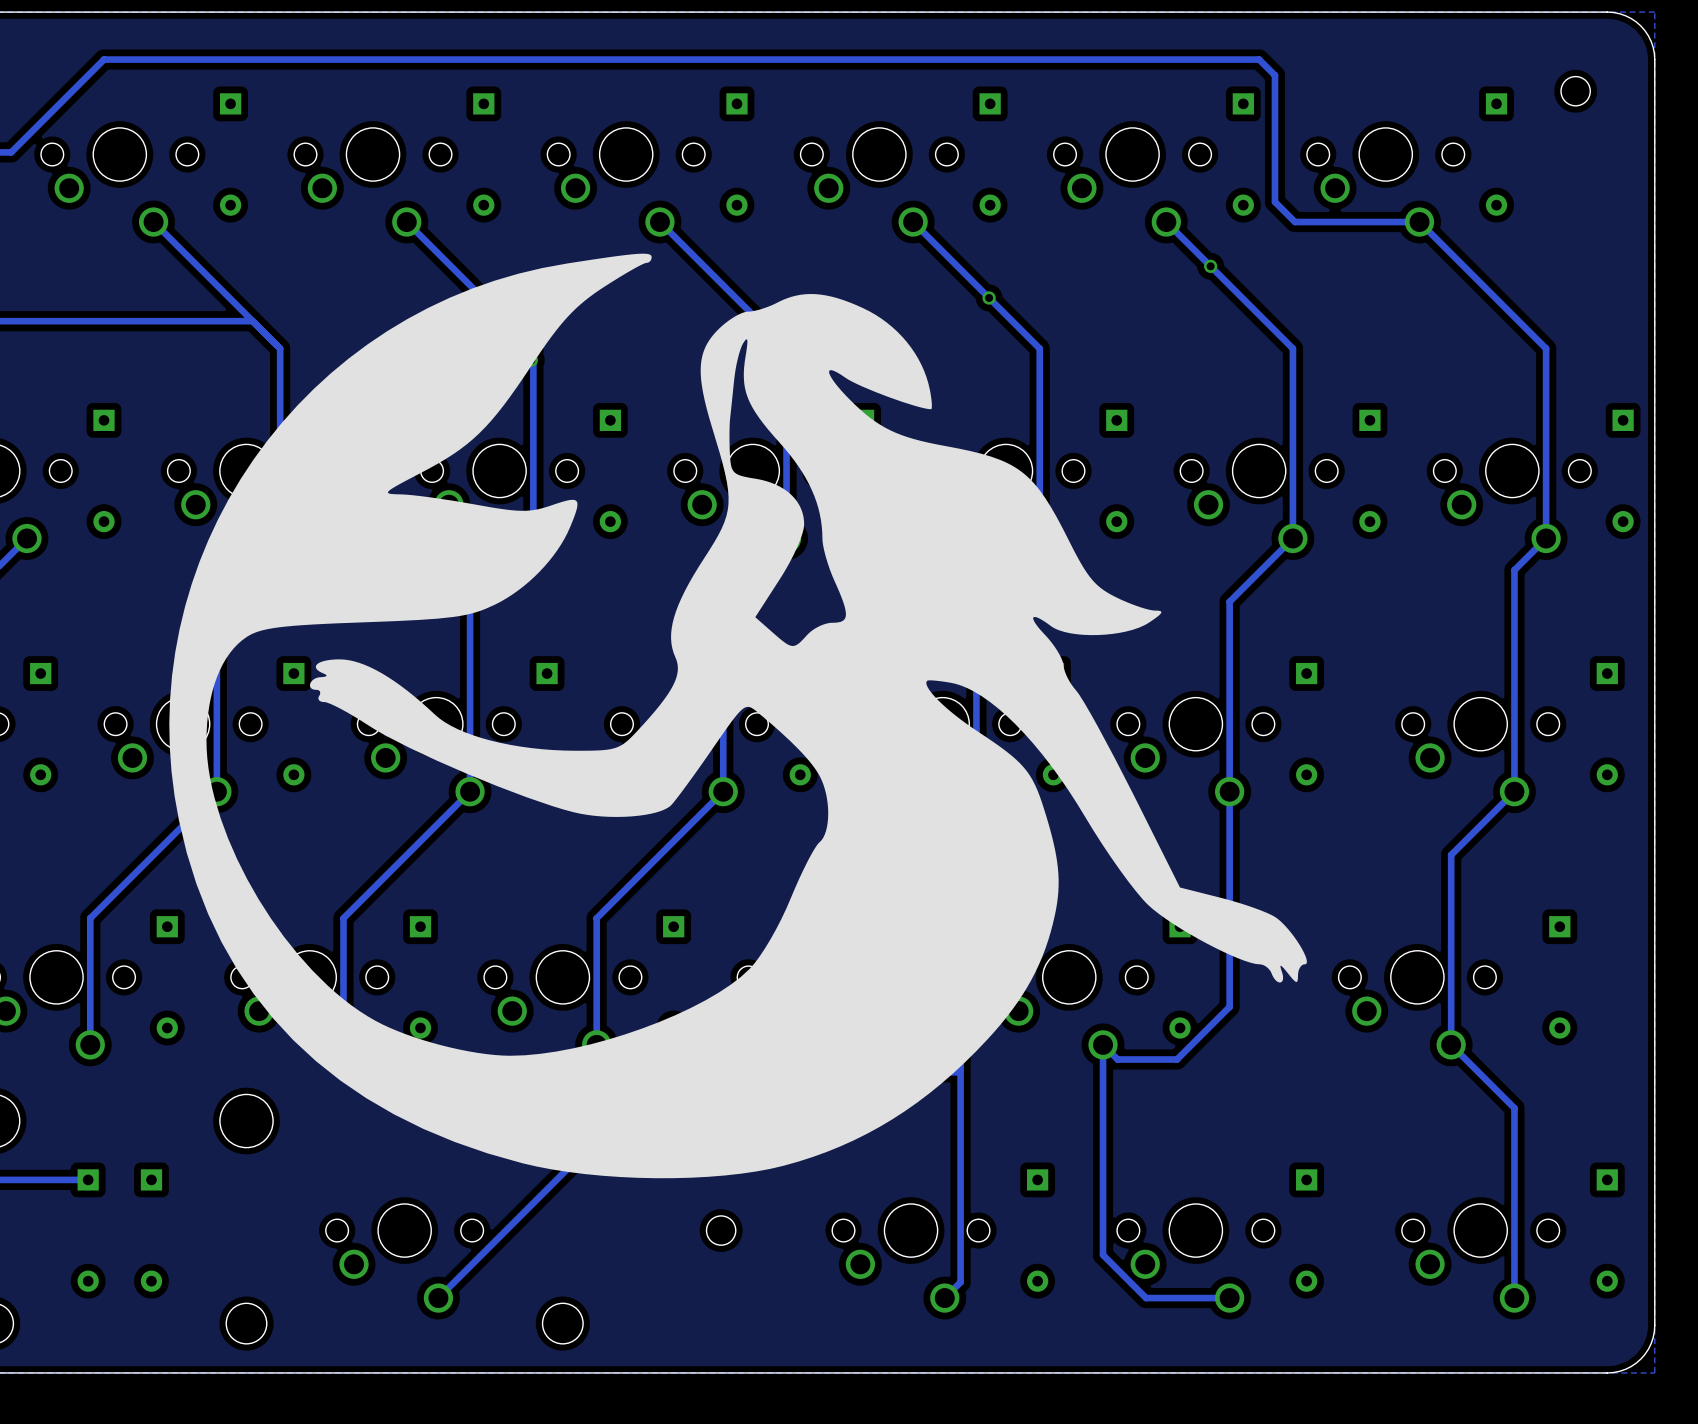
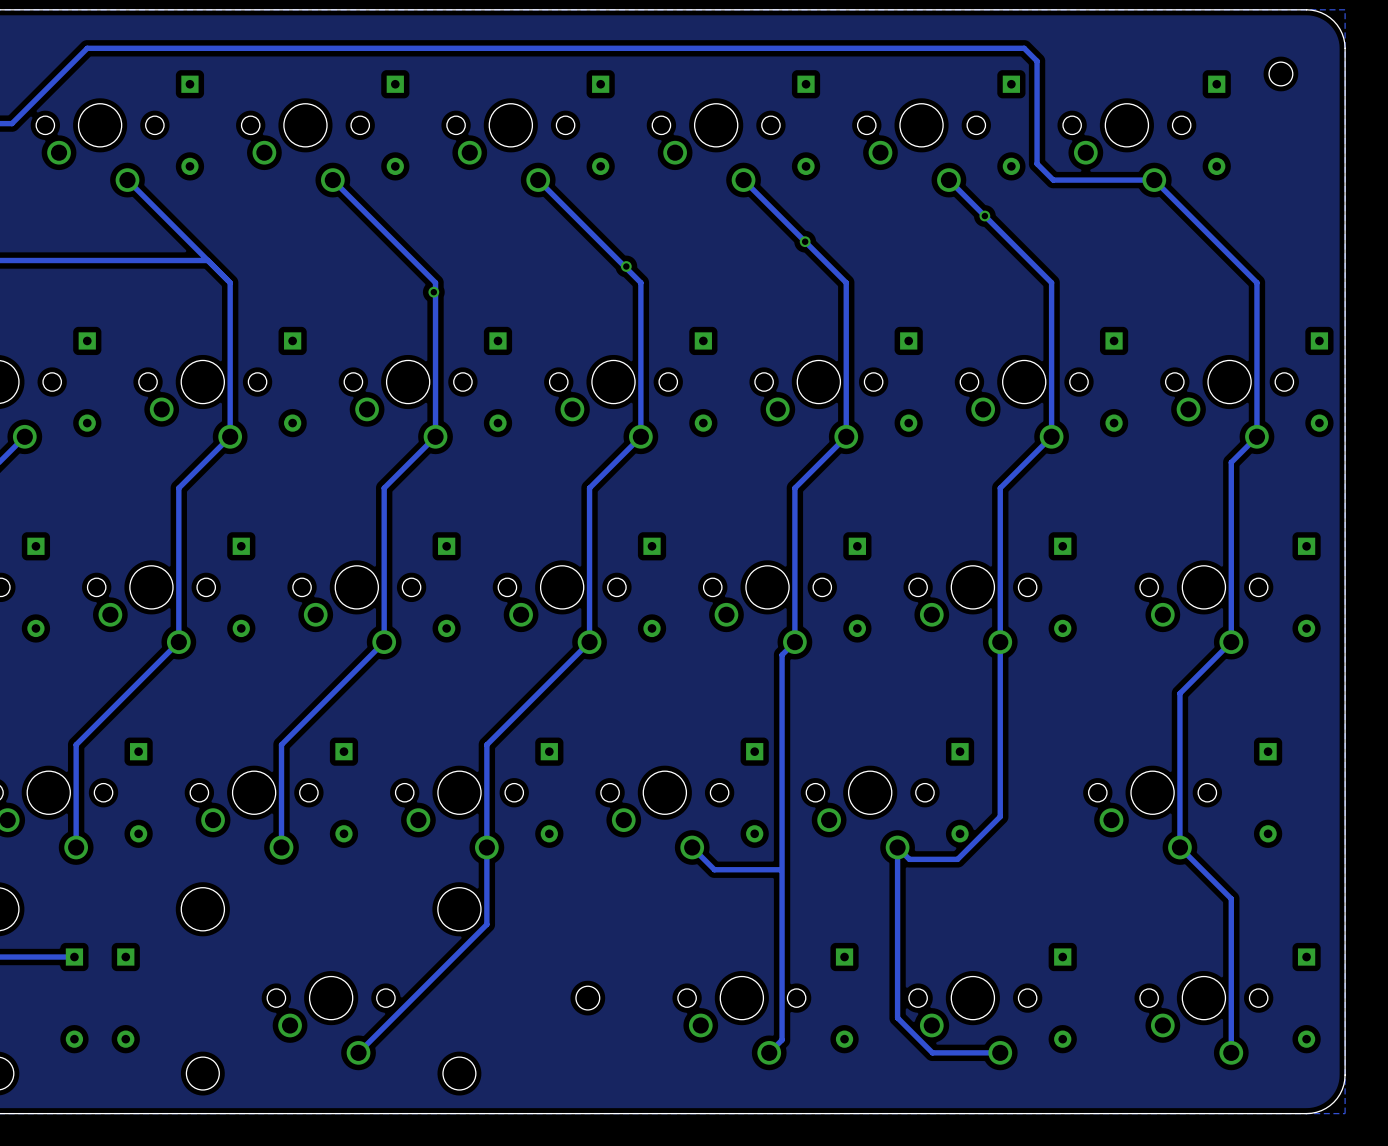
drawing: [169, 253, 1307, 1179] -> none

